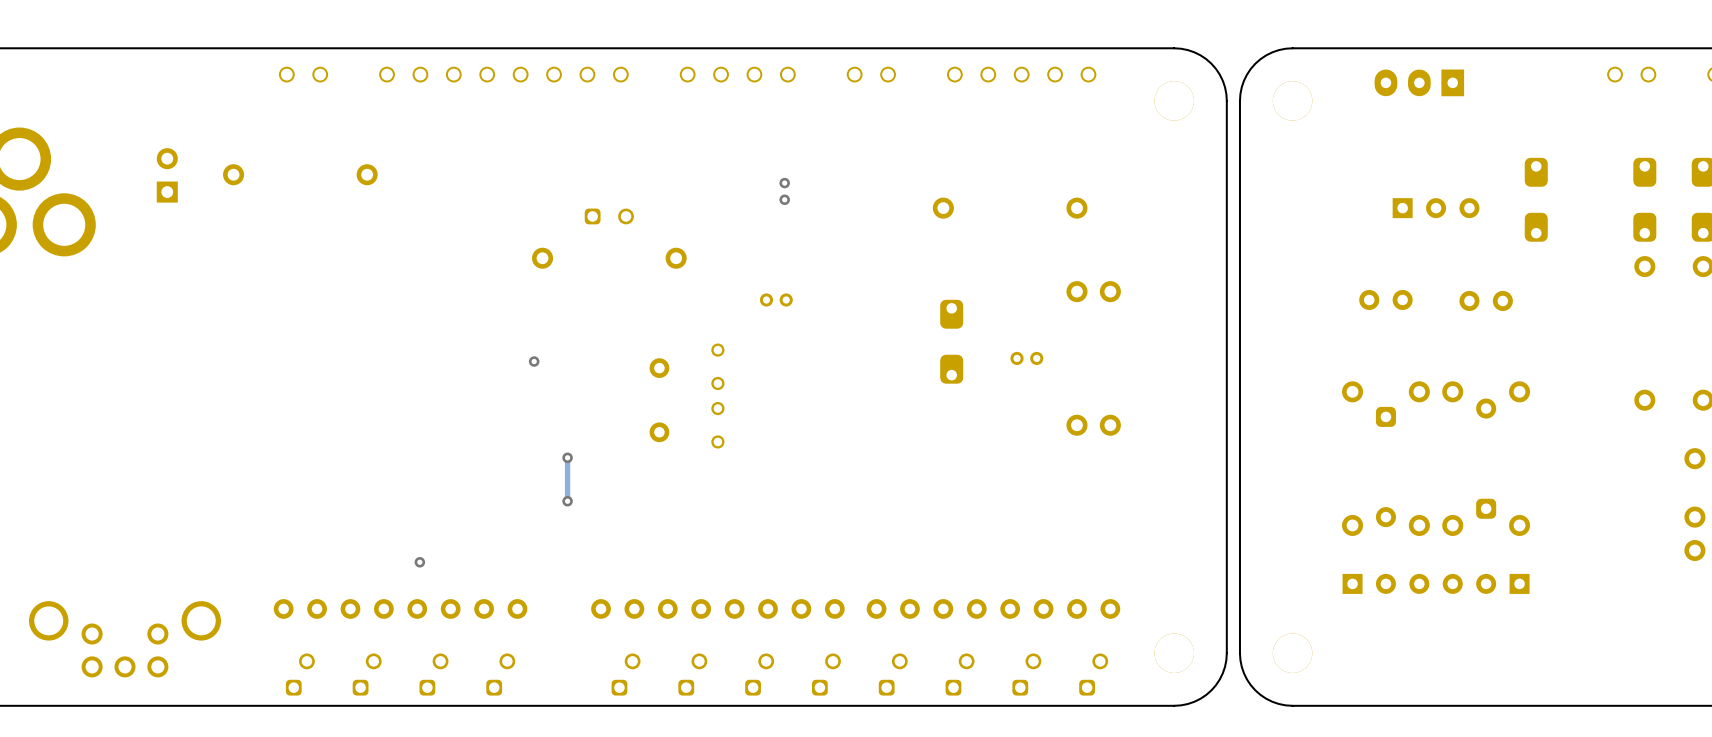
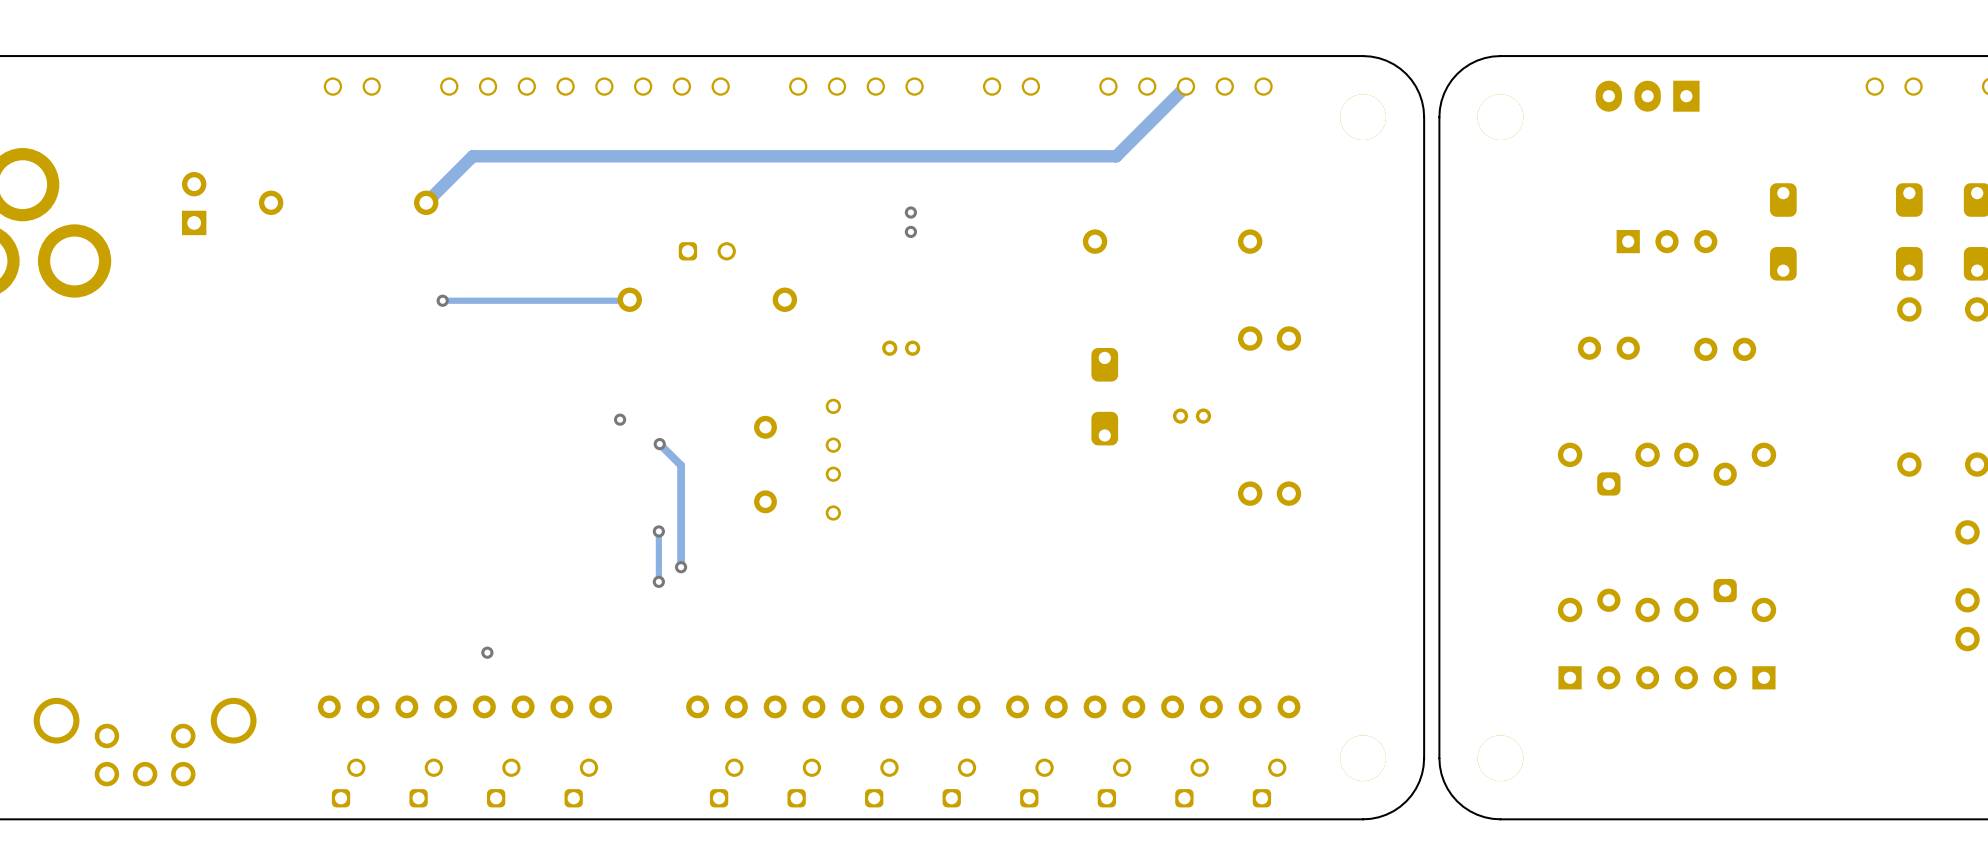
track: none -> (1185, 86) (1116, 156) (472, 156) (426, 202)
track: none -> (629, 299) (442, 300)
via: none -> (442, 300)
track: none -> (659, 444) (681, 465) (681, 567)
via: none -> (659, 444)
via: none -> (681, 567)

